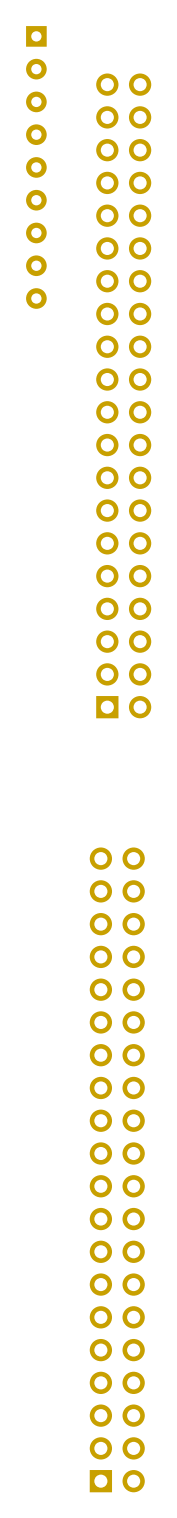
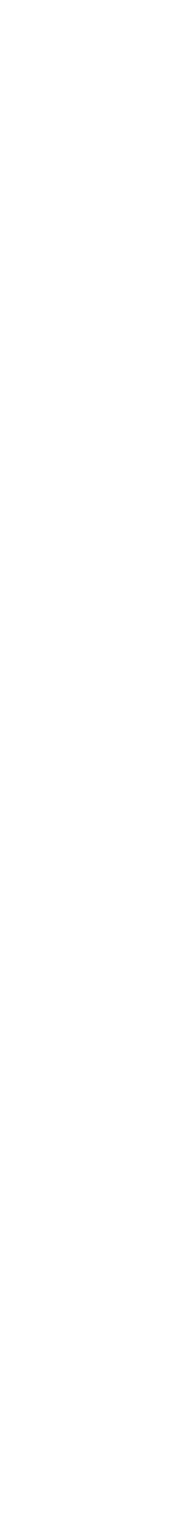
part: (36, 167) -> none
part: (123, 395) -> none
part: (117, 1169) -> none

